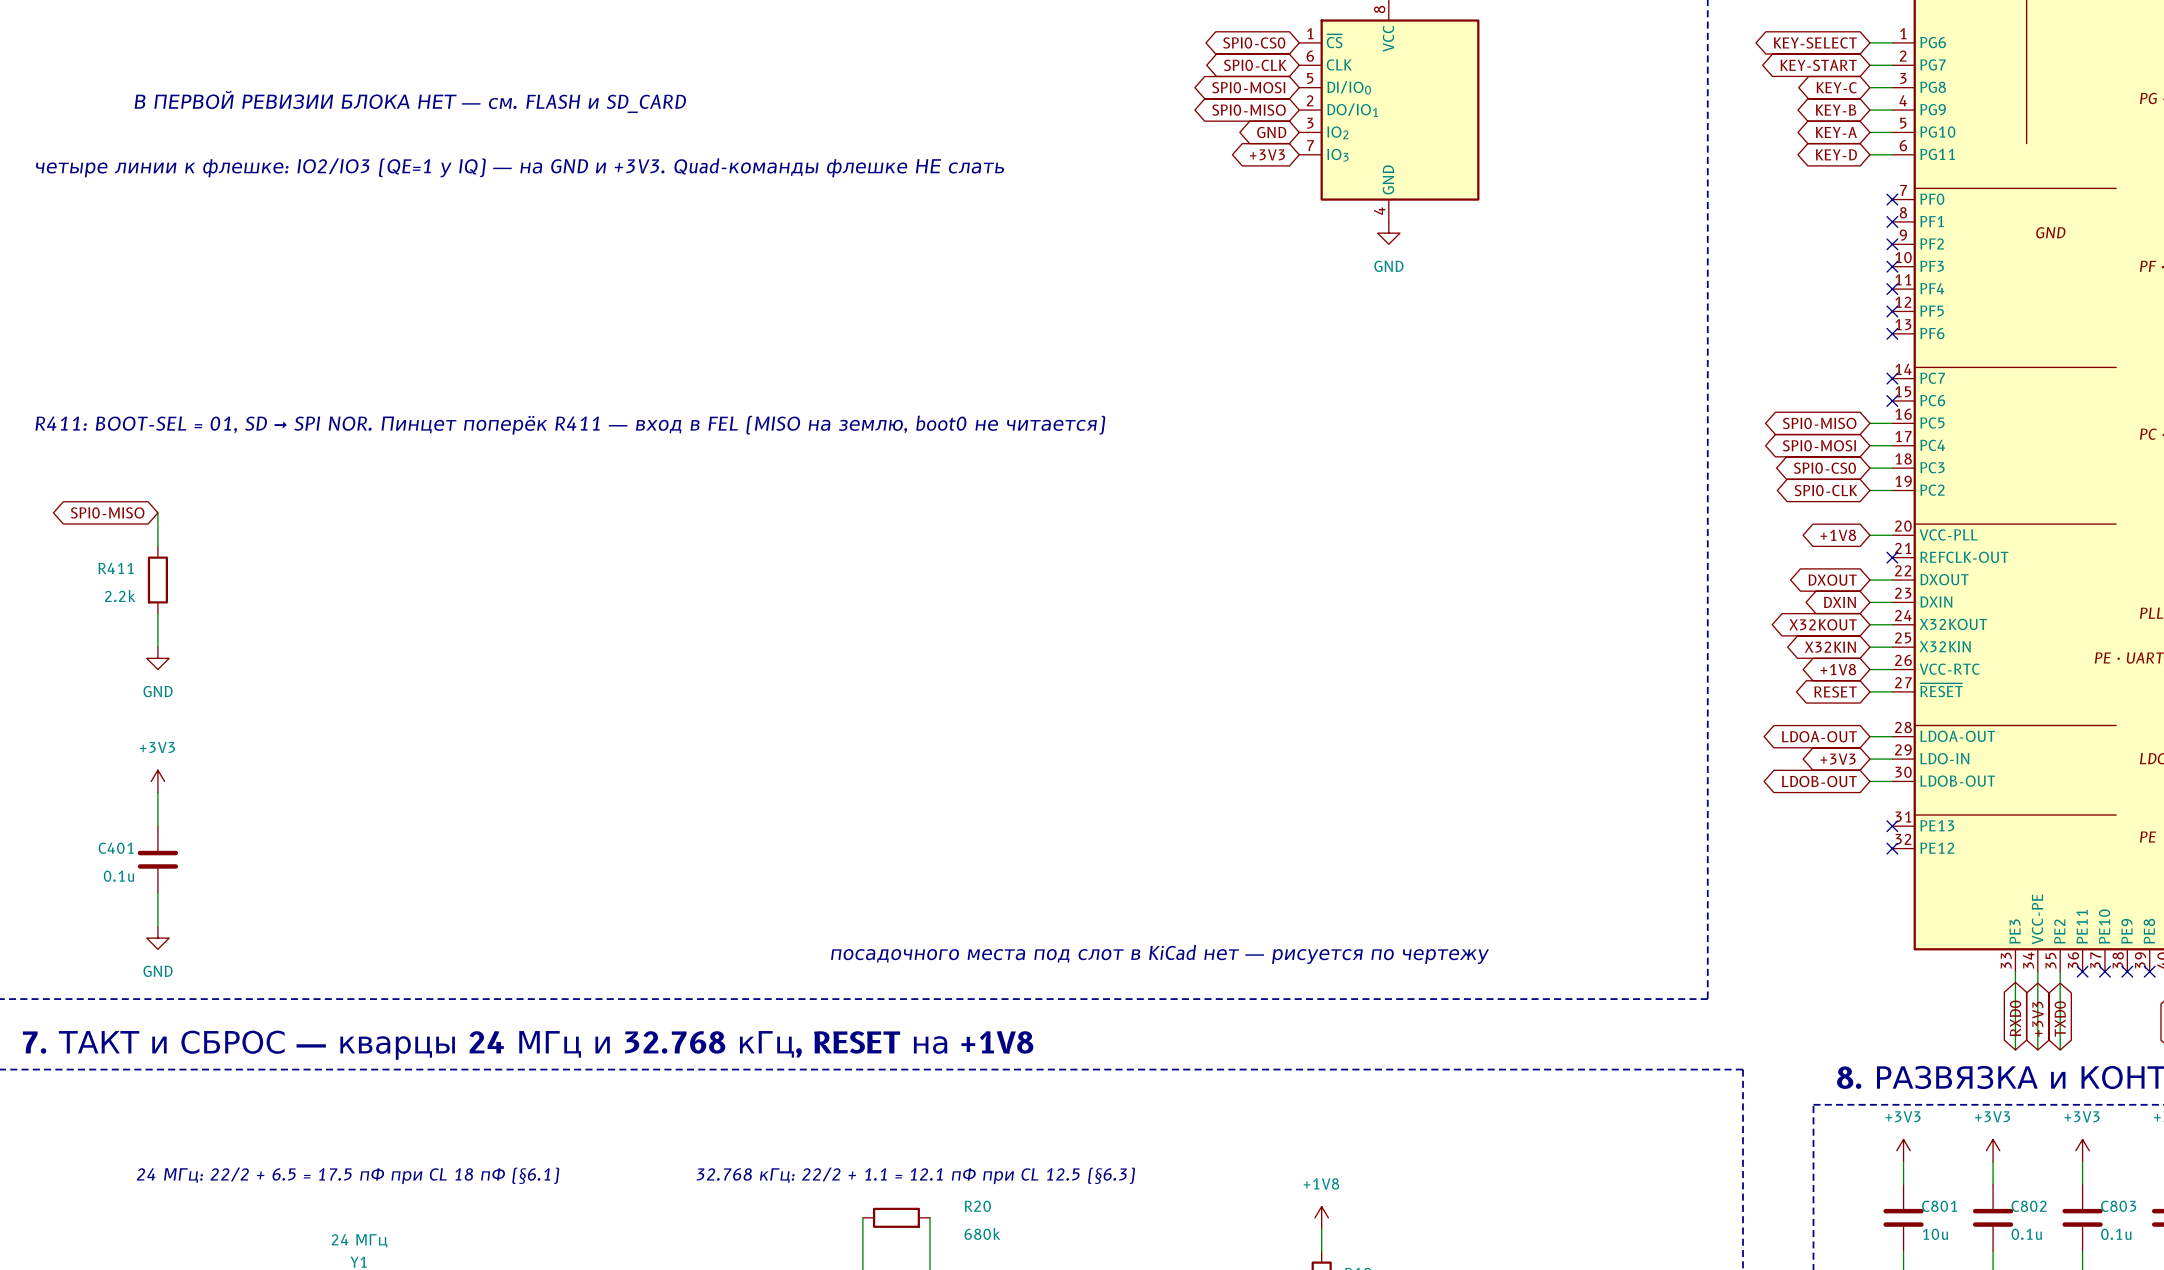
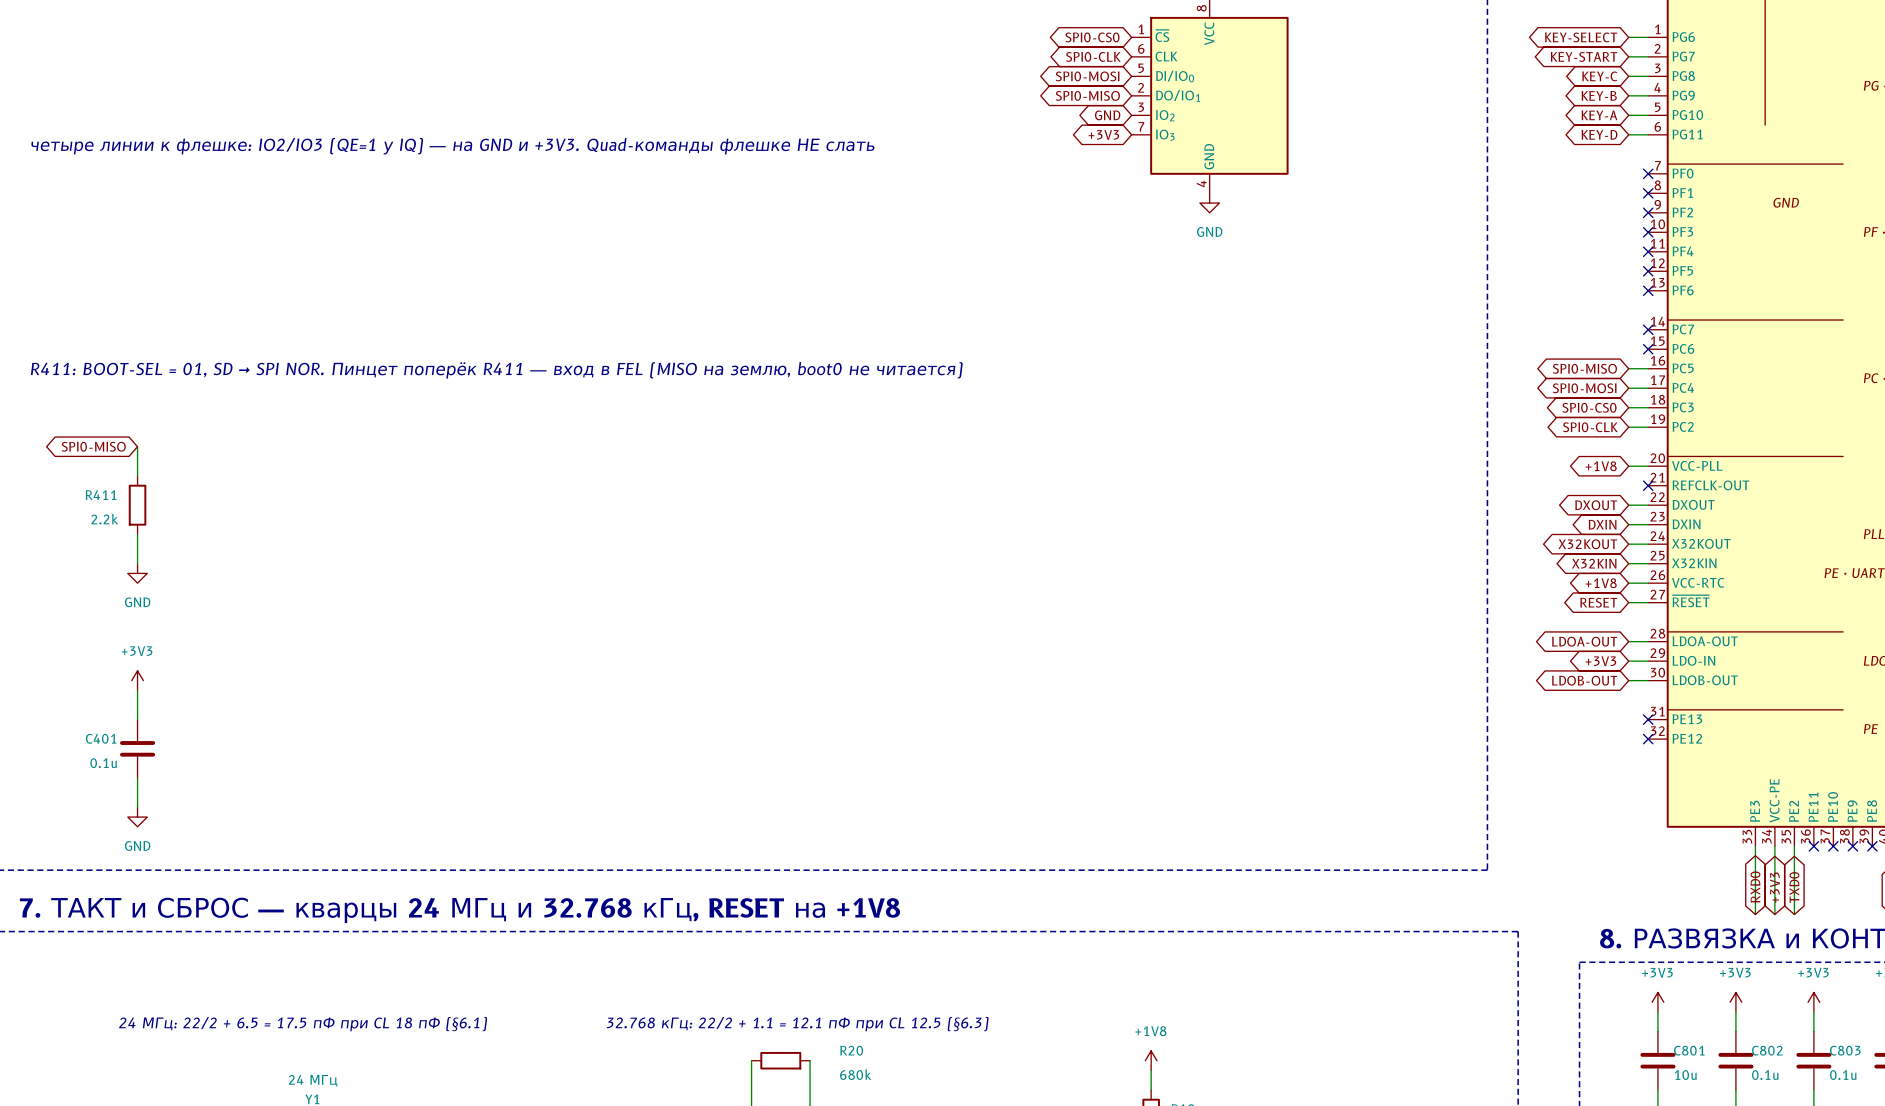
text: В ПЕРВОЙ РЕВИЗИИ БЛОКА НЕТ — см. FLASH и SD_CARD (410, 101) -> none
text: посадочного места под слот в KiCad нет — рисуется по чертежу (1160, 954) -> none

